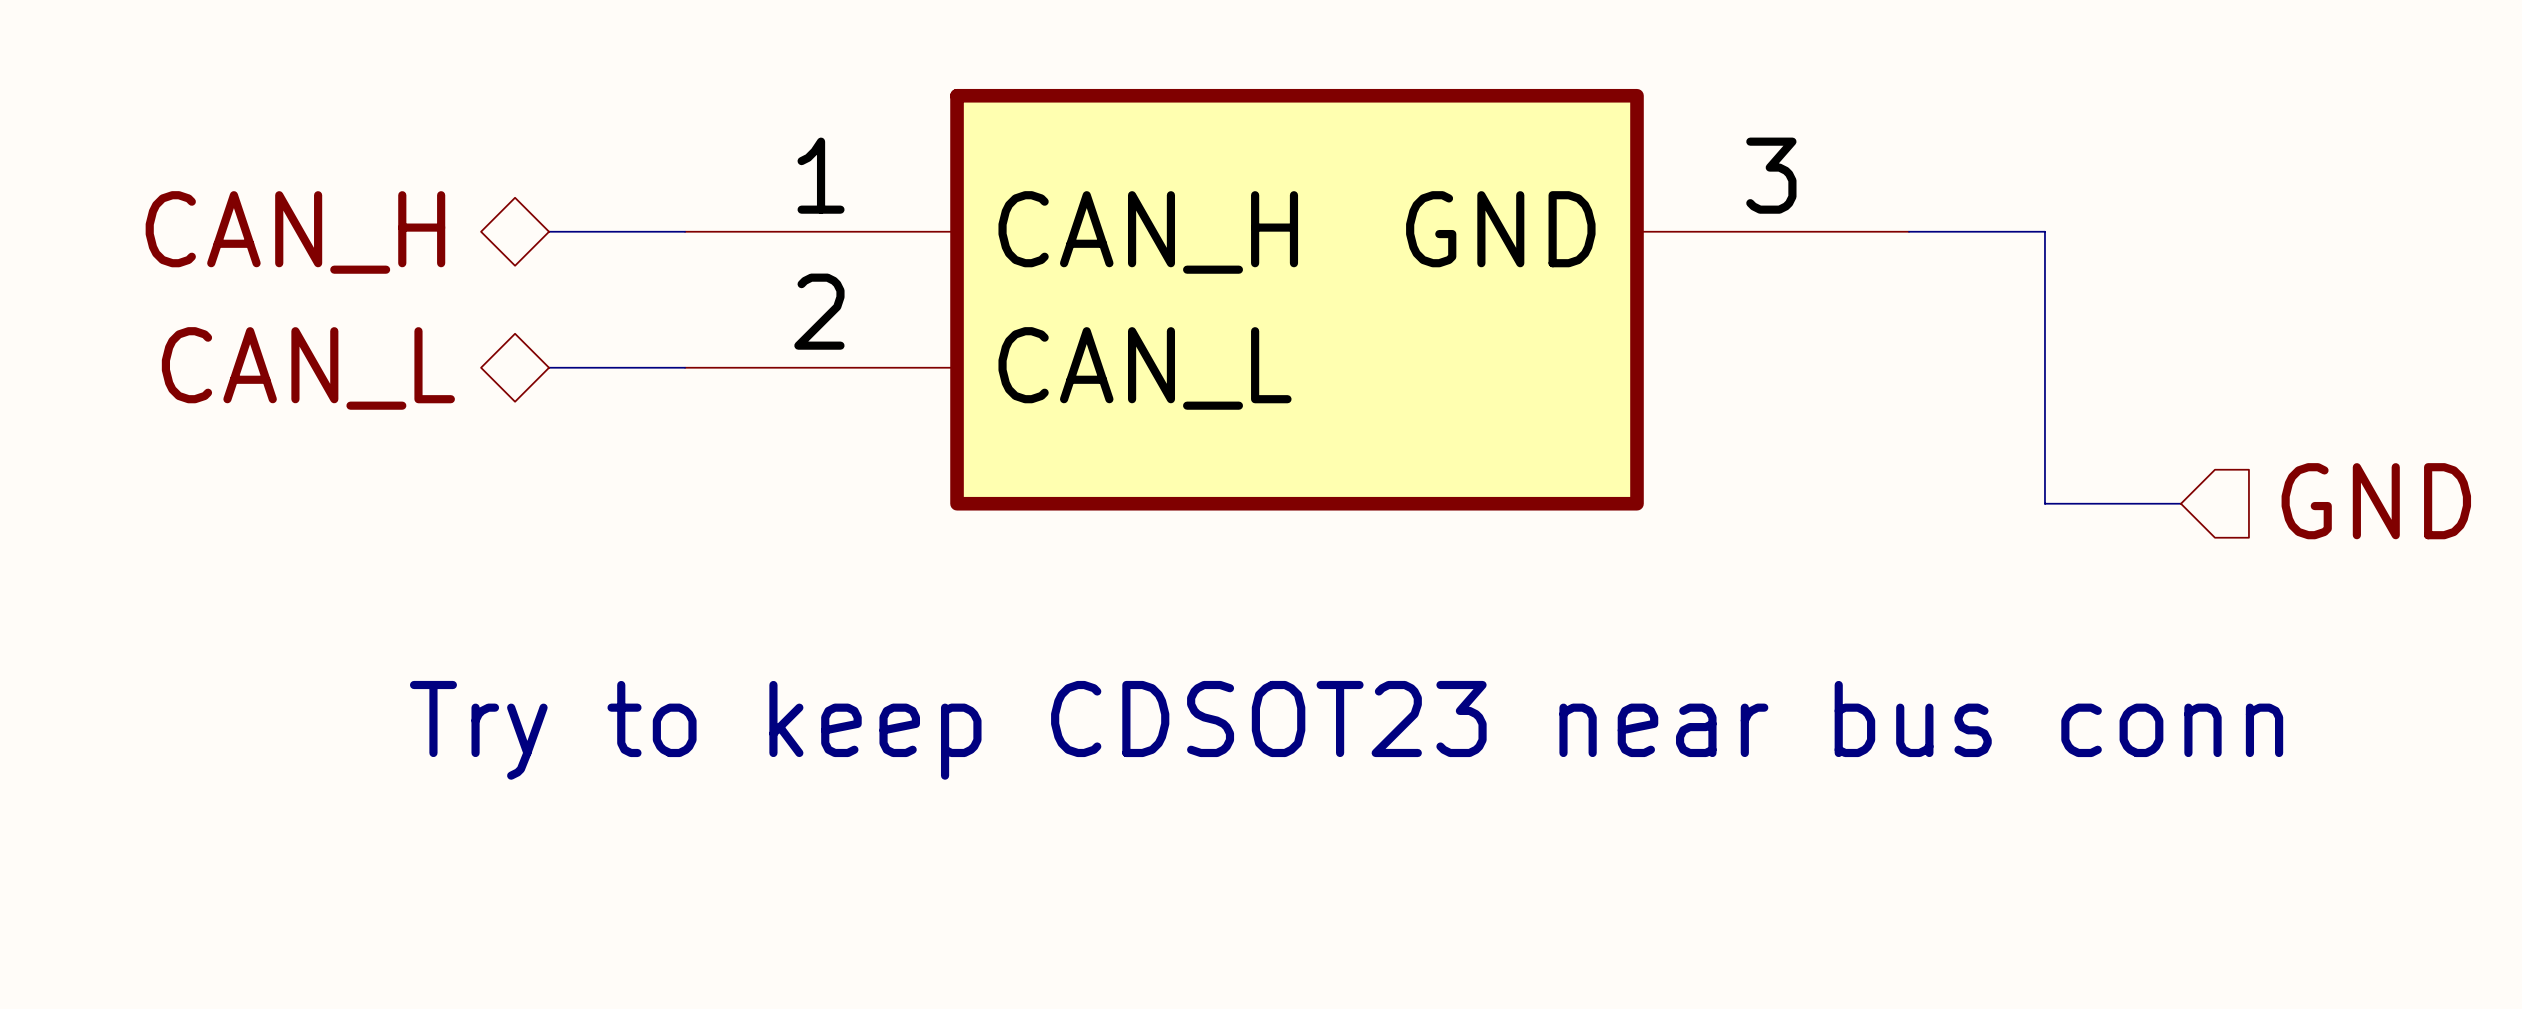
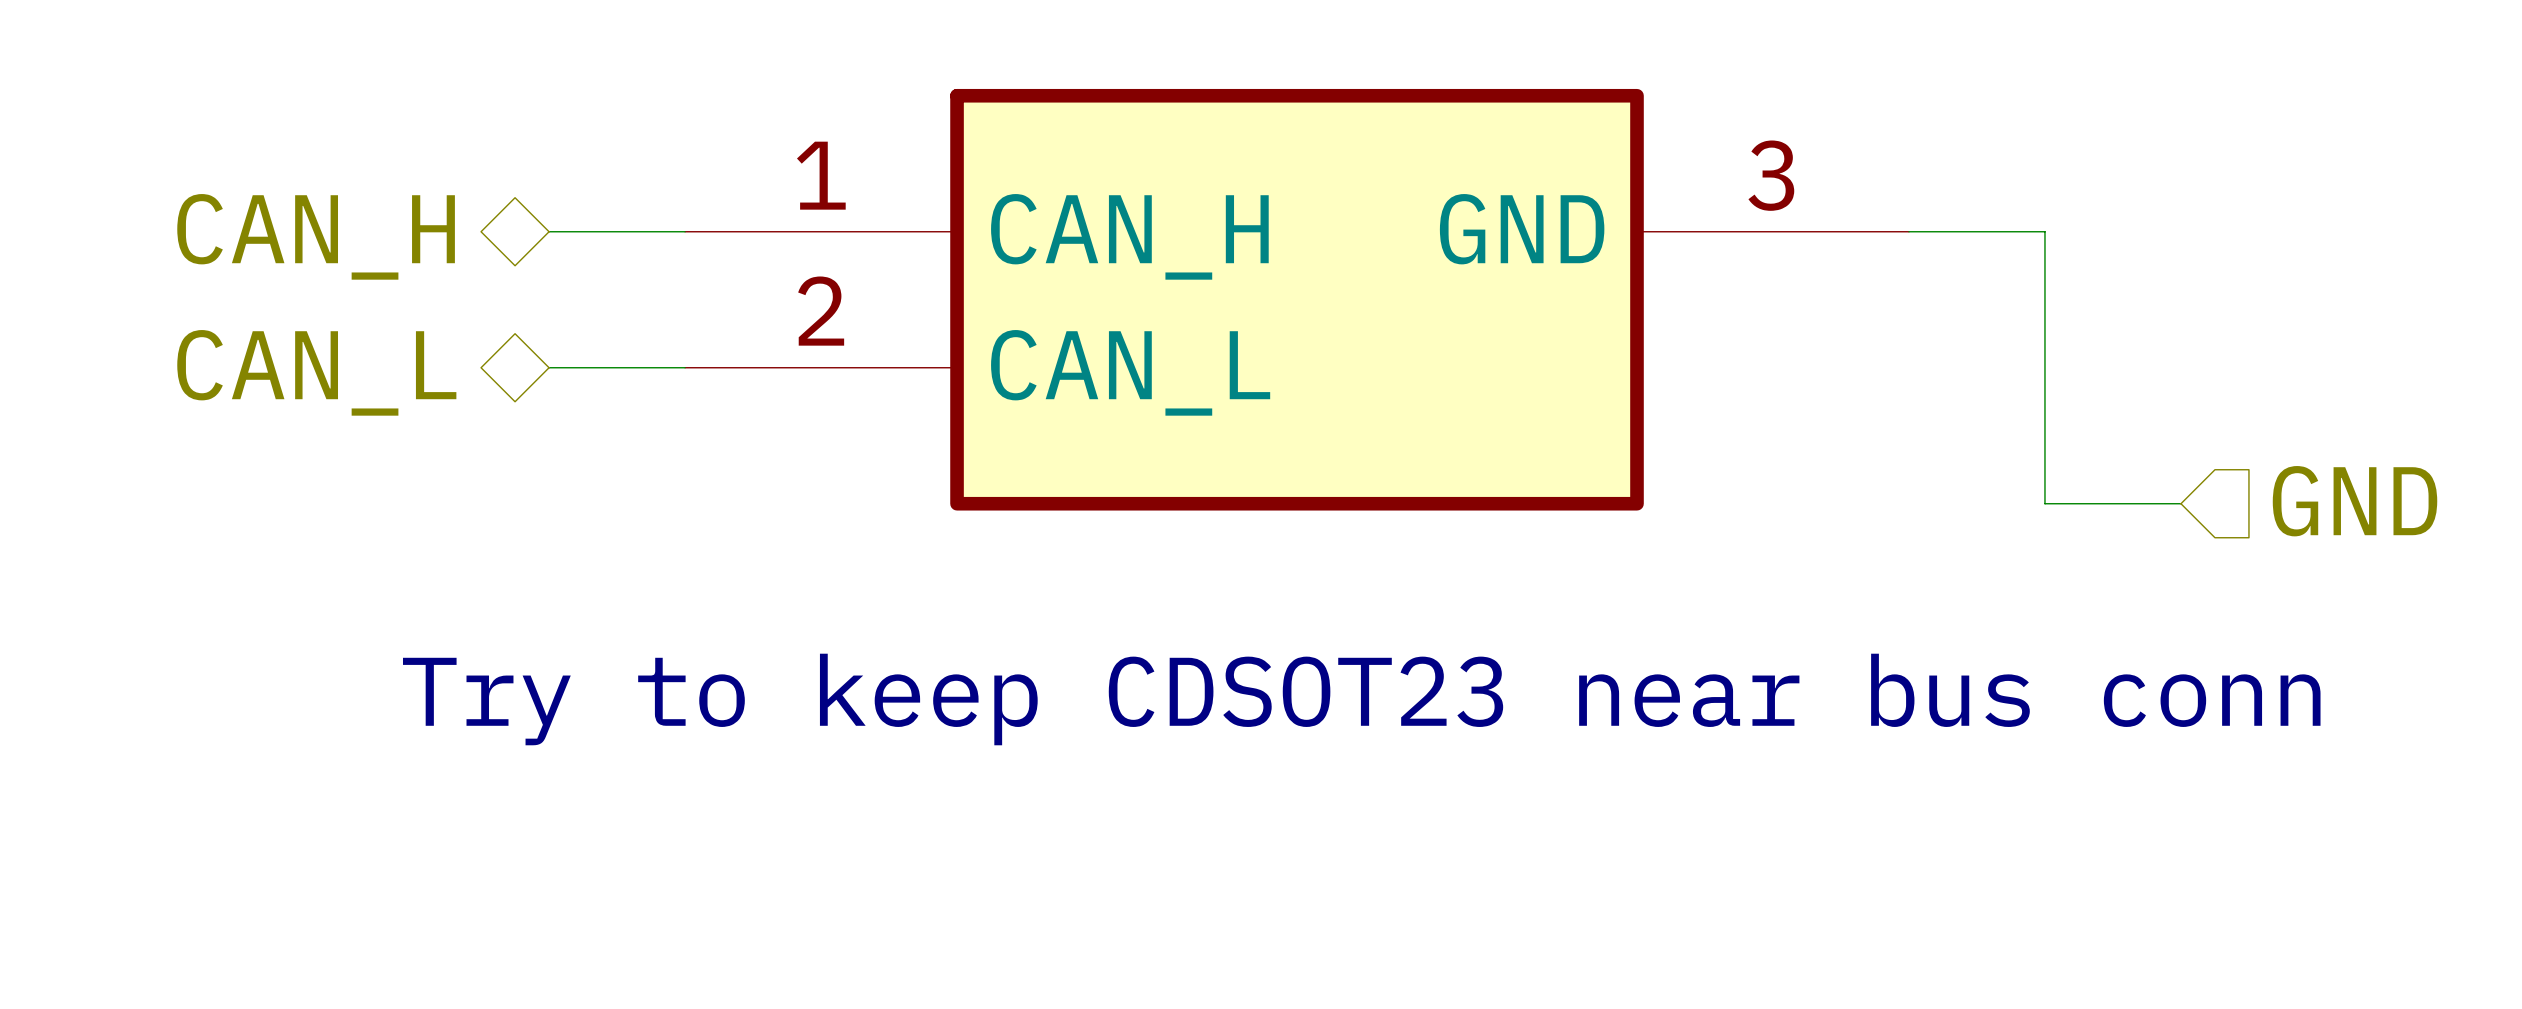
text position: Try to keep CDSOT23 near bus conn (1346, 730) -> Try to keep CDSOT23 near bus conn (1361, 699)

